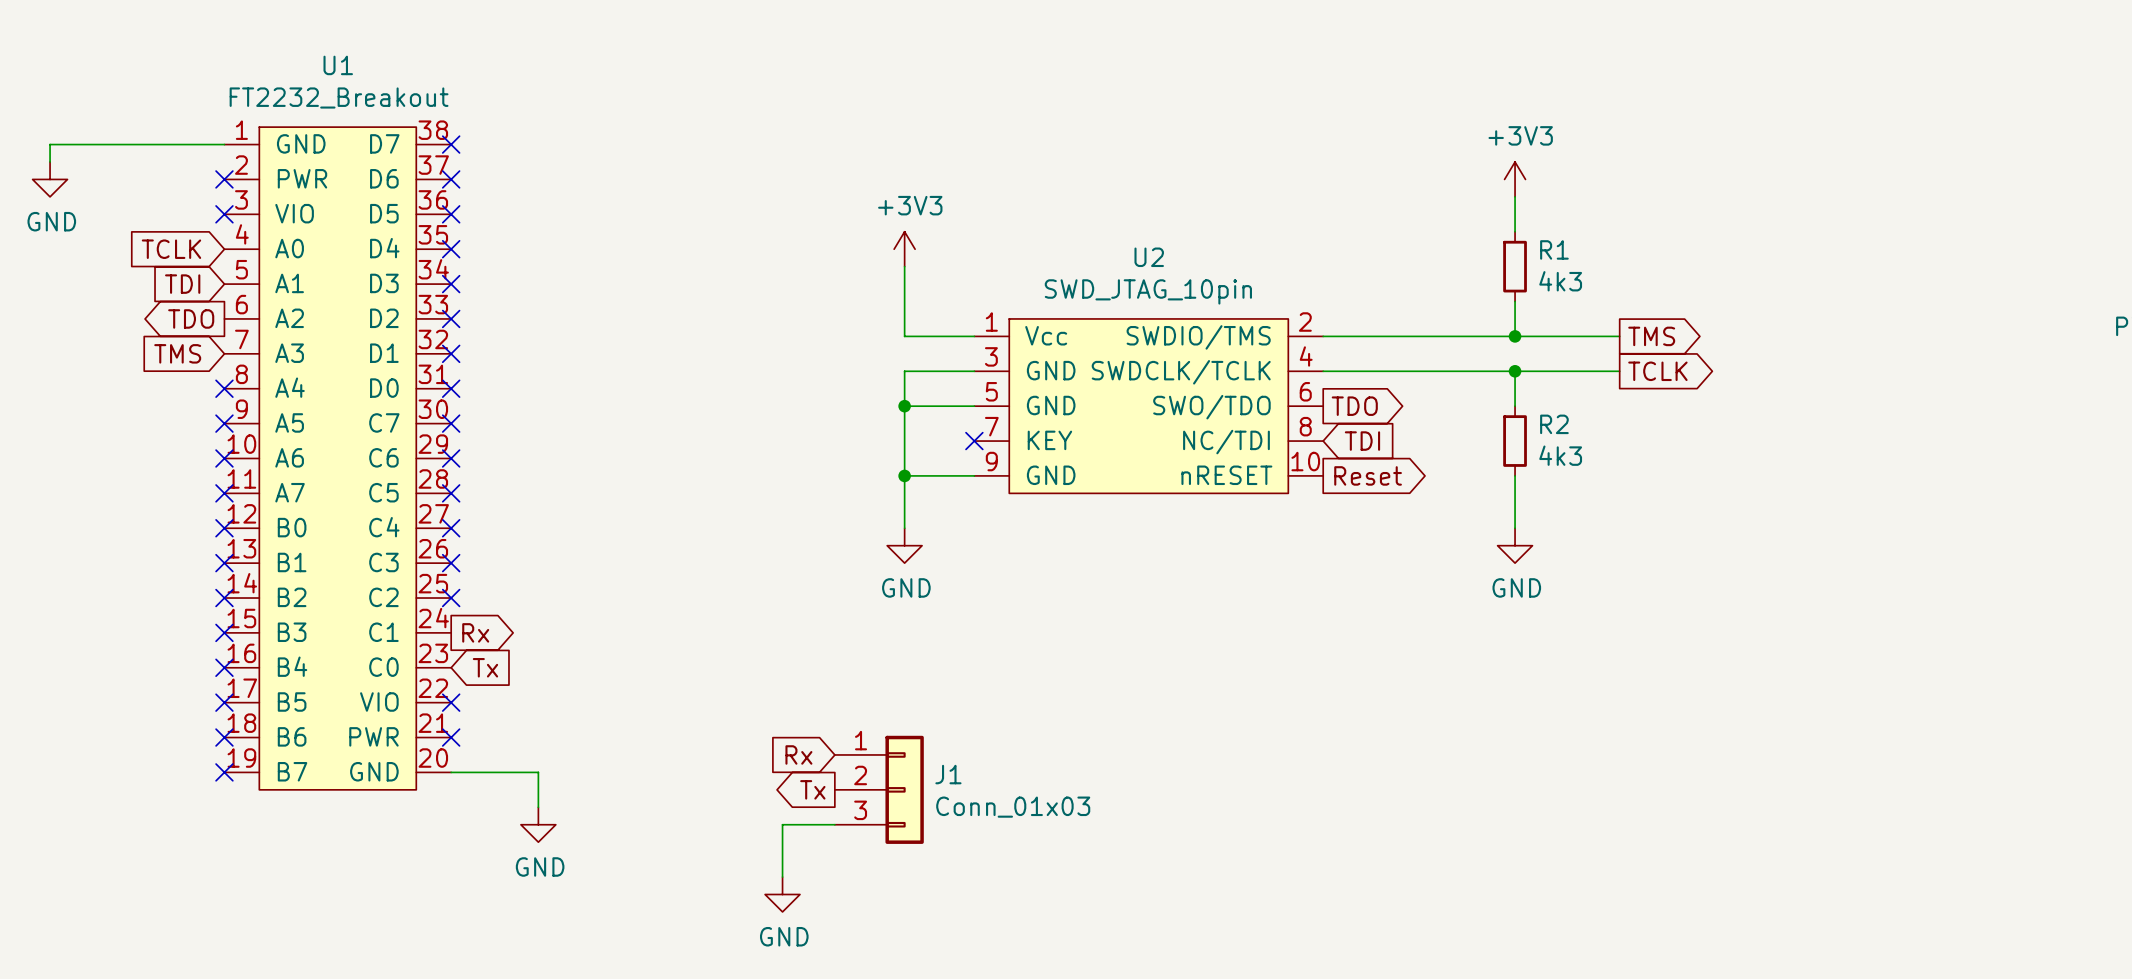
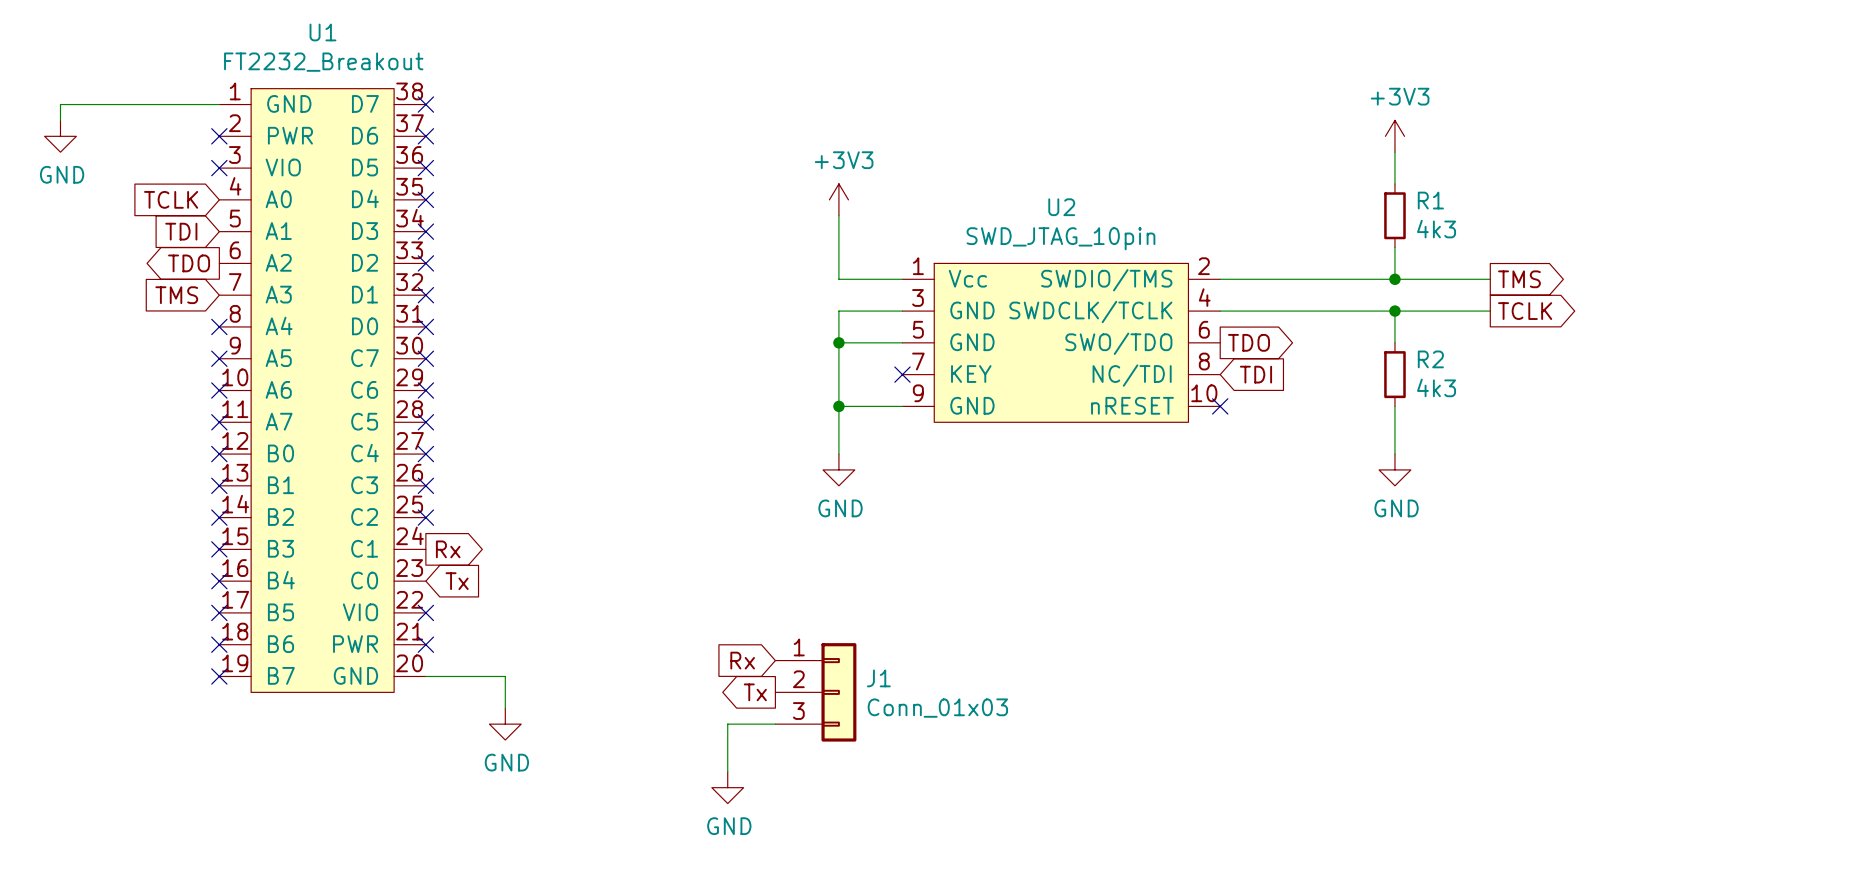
no-connect mark: none -> (1220, 406)
global label: Reset (1368, 475) -> none

